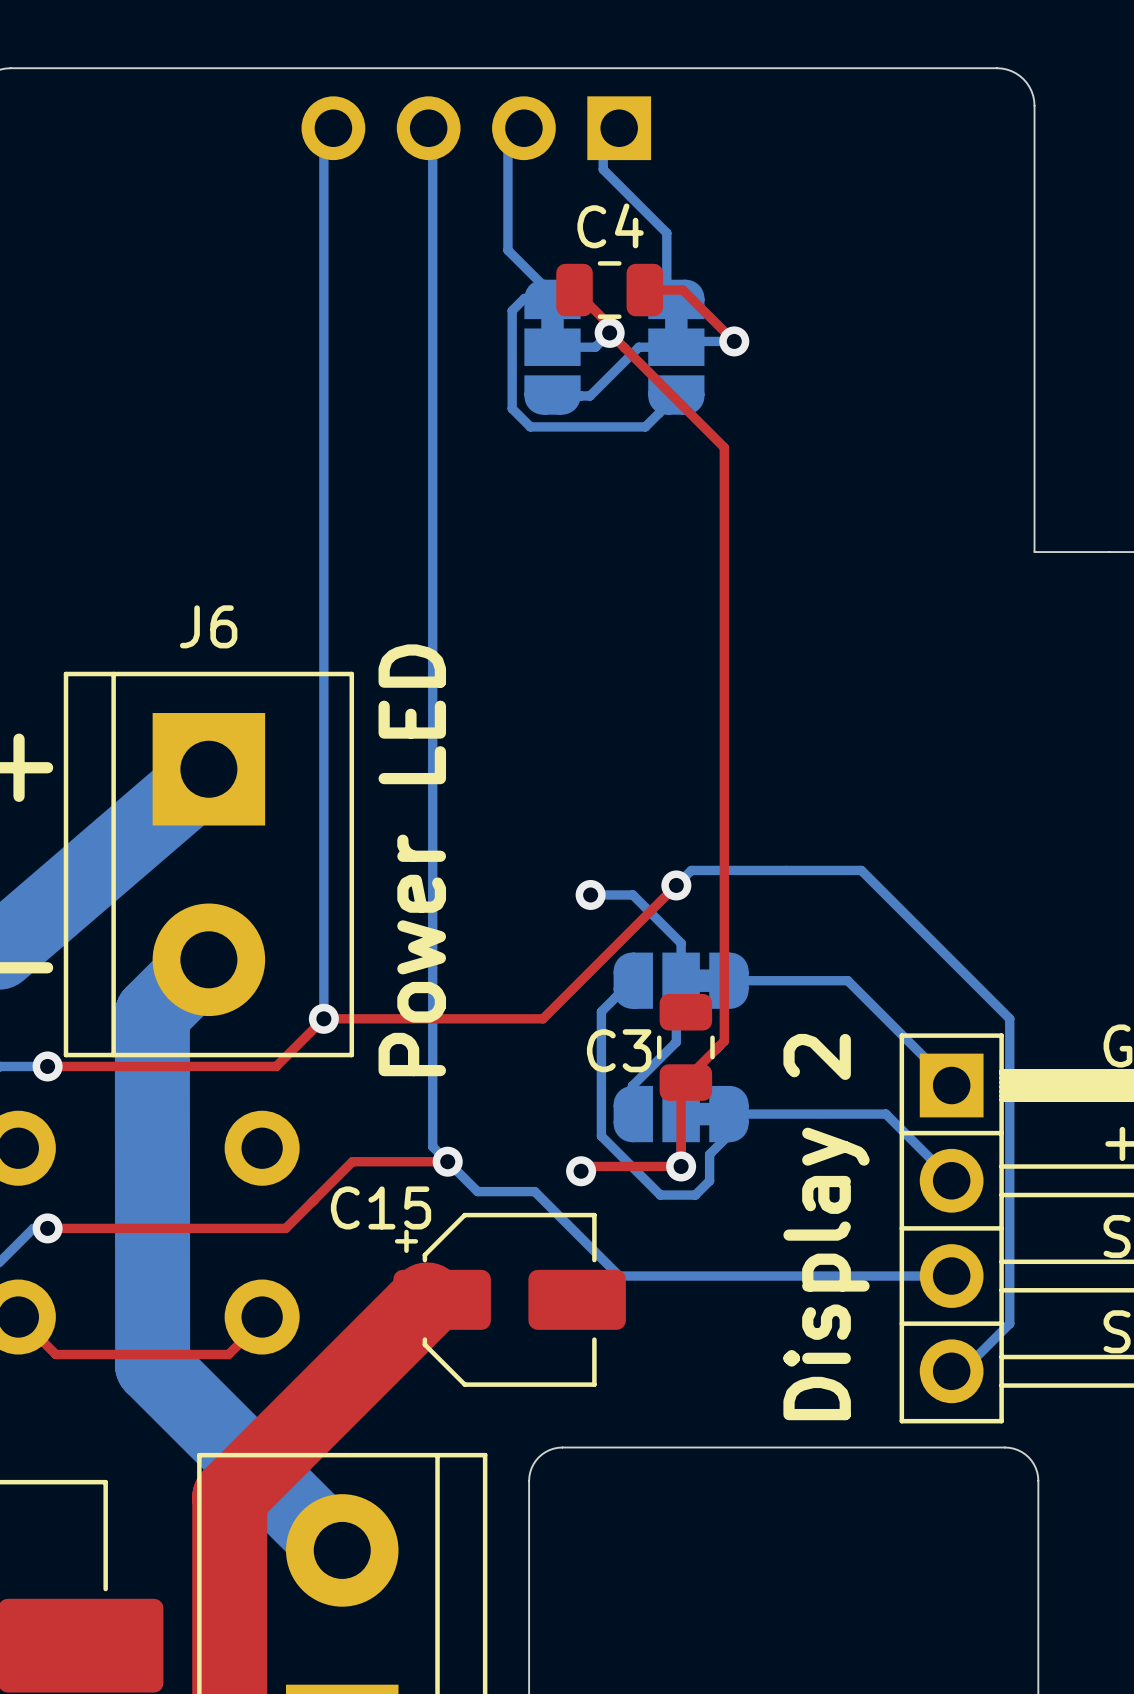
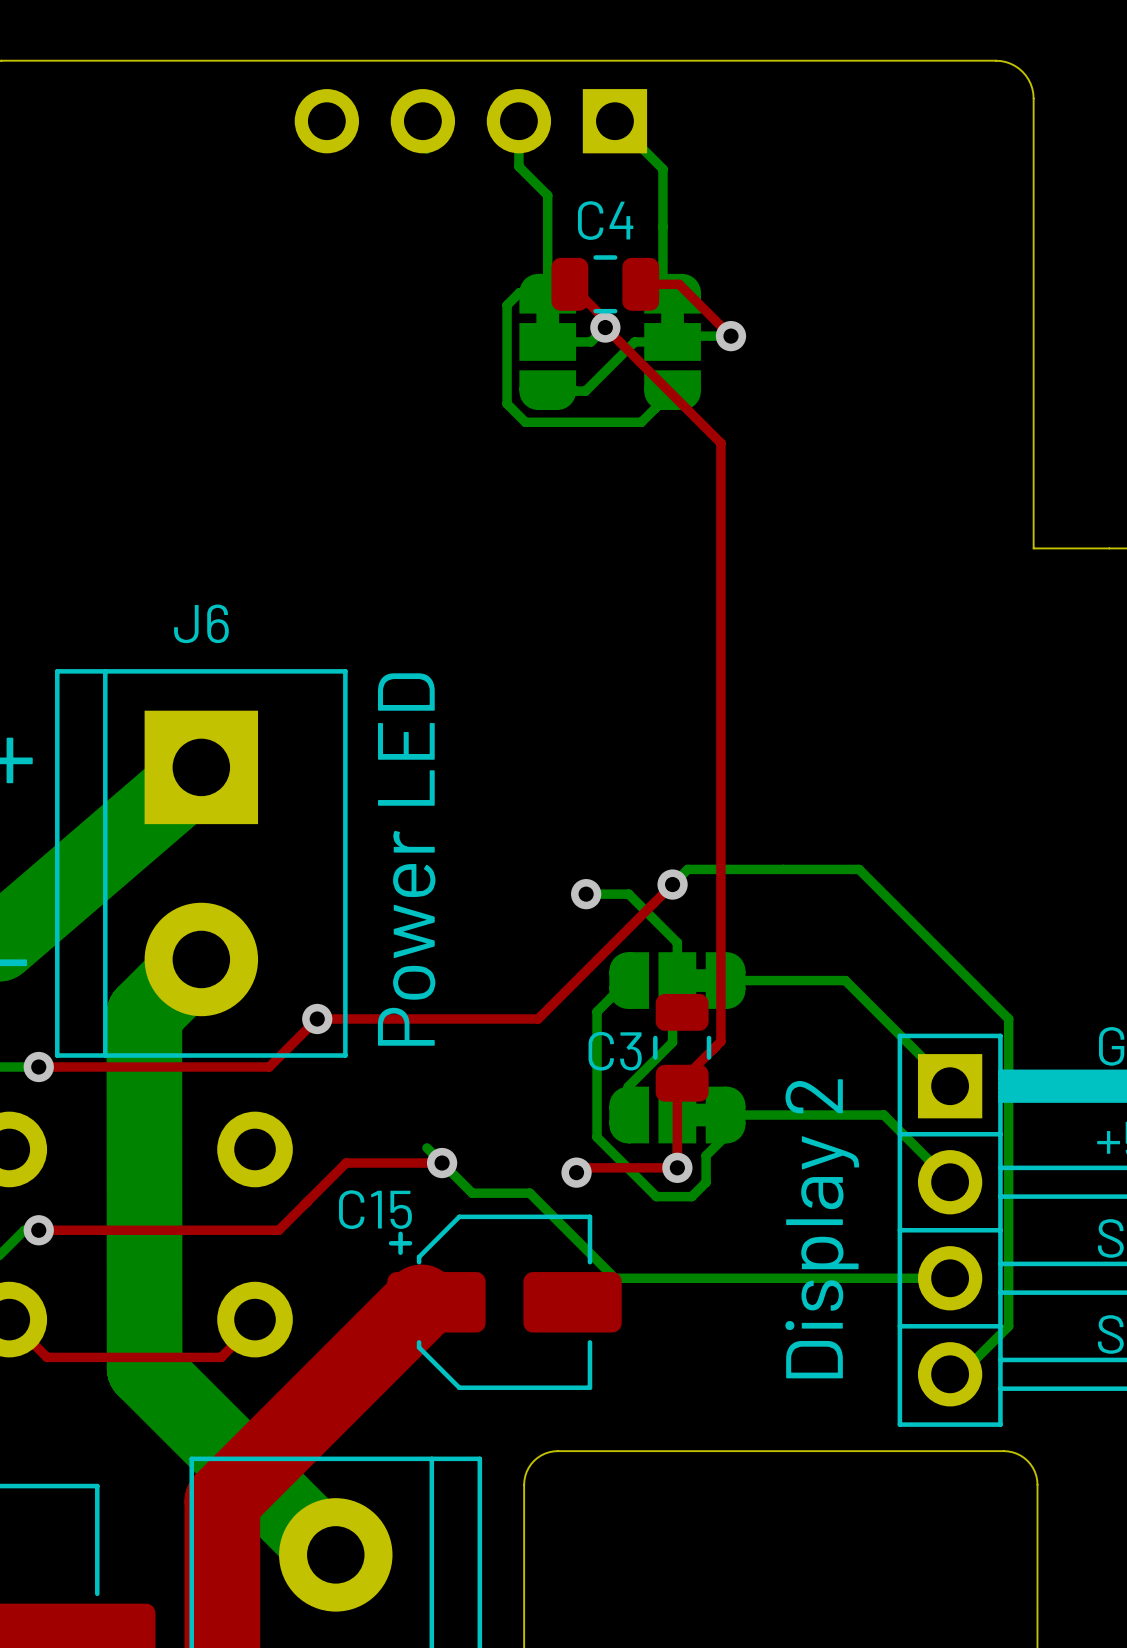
bottom track: (507, 128) (507, 250) (552, 294) -> (518, 121) (518, 166) (547, 195) (547, 289)
bottom track: (603, 128) (603, 169) (666, 233) -> (614, 121) (662, 169) (662, 226)
bottom track: (323, 132) (323, 1018) -> none
bottom track: (432, 155) (432, 1146) -> none

